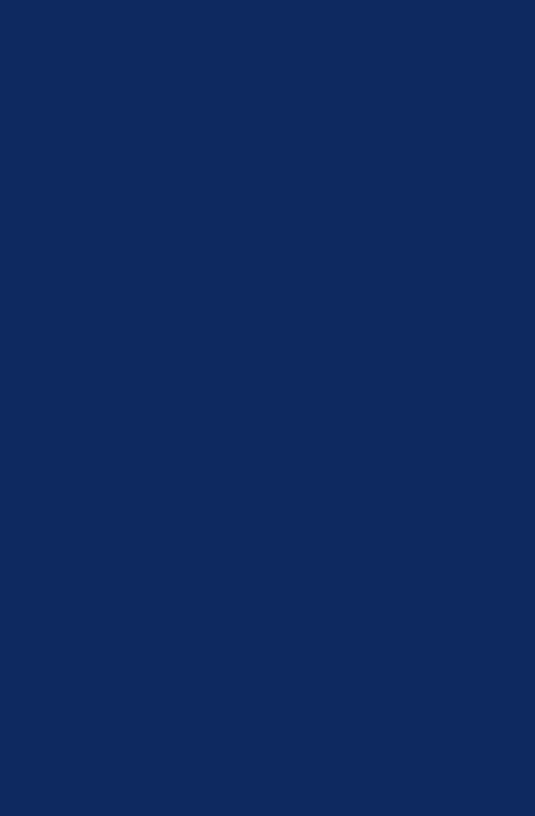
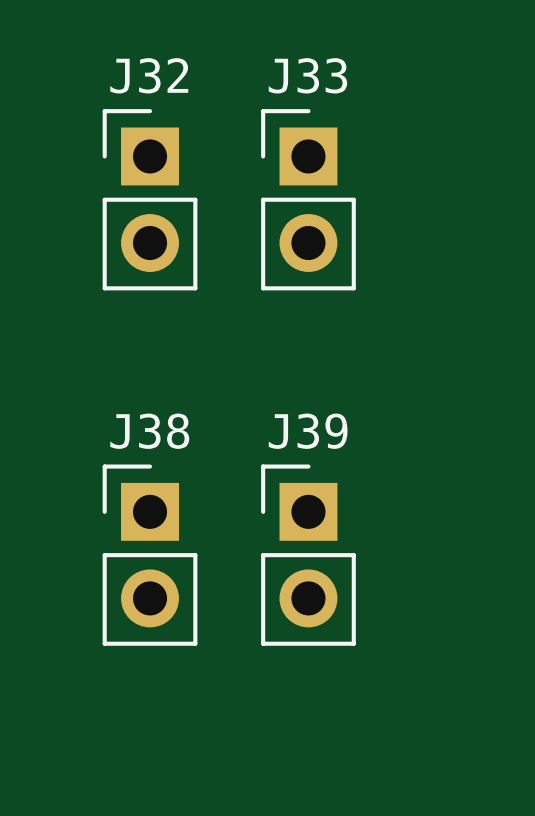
J32: none -> (150, 199)
J33: none -> (308, 199)
J38: none -> (150, 555)
J39: none -> (308, 555)

